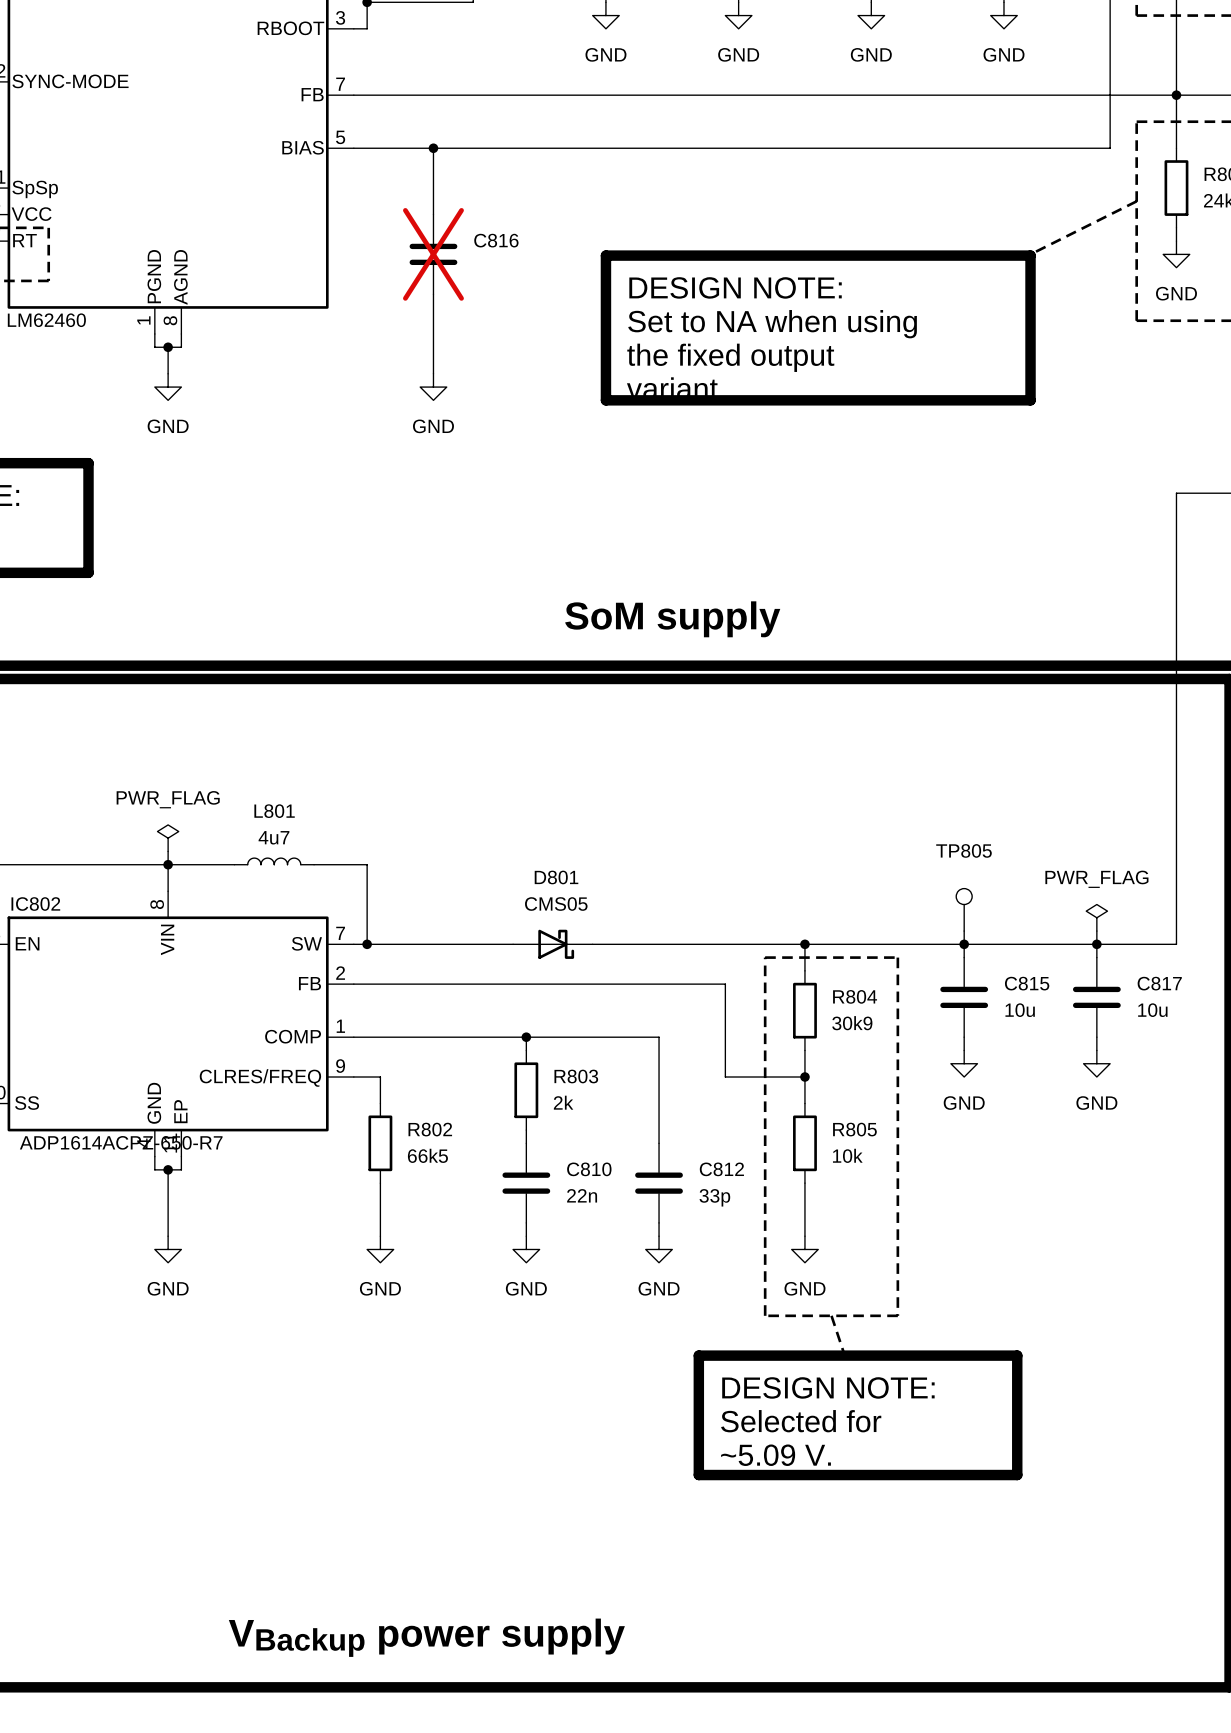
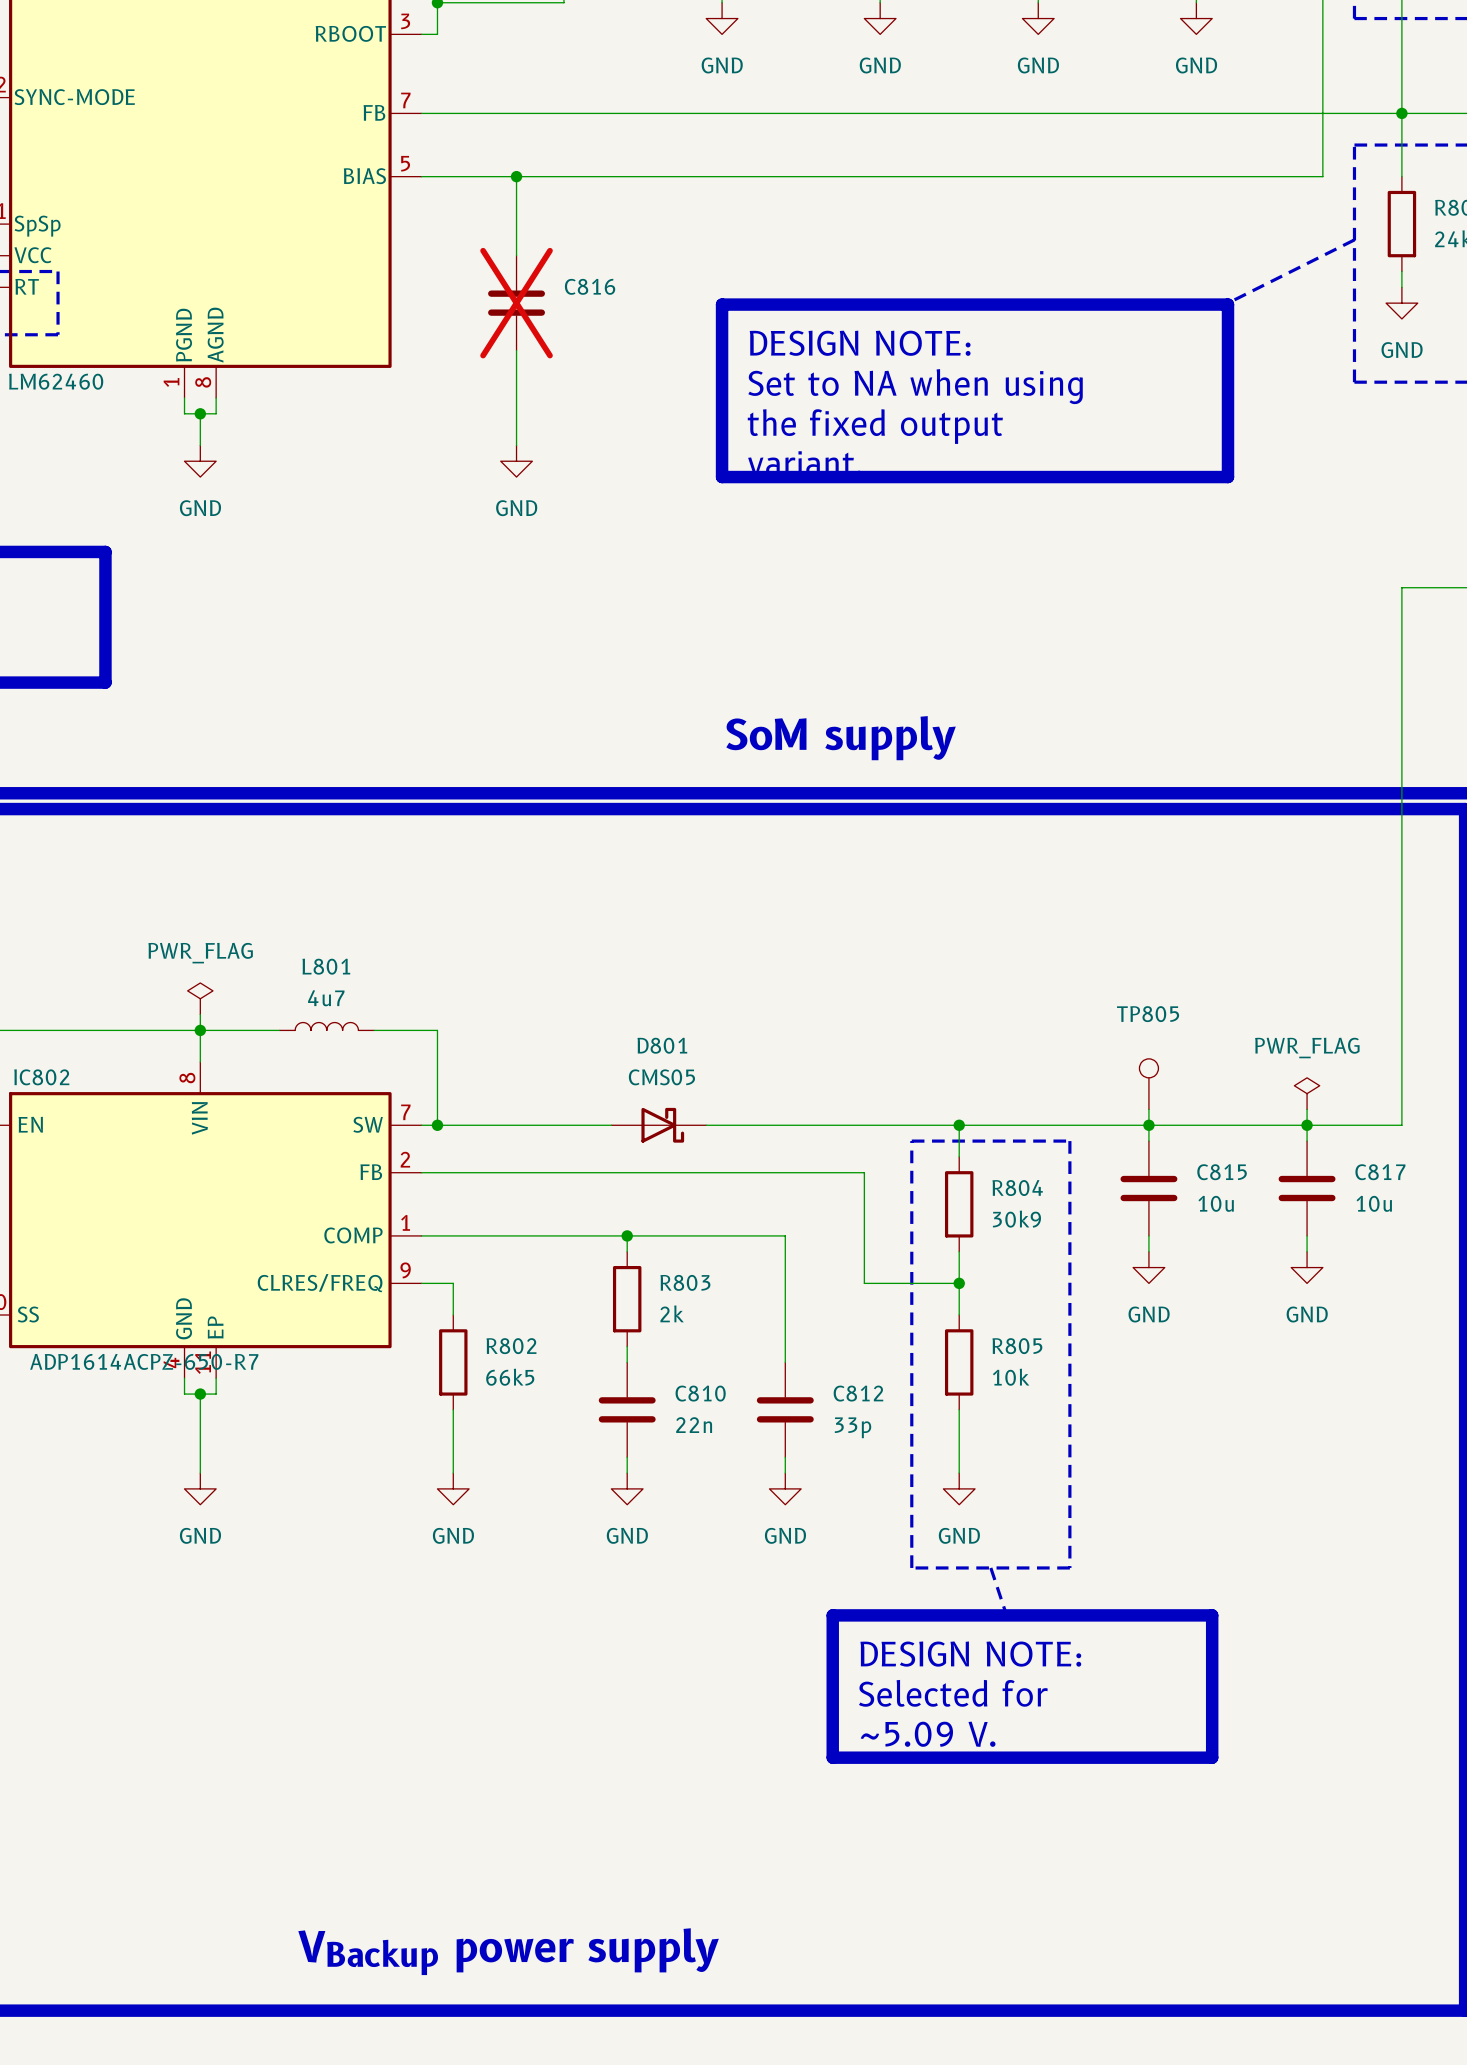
text position: SoM supply (672, 619) -> SoM supply (841, 738)

